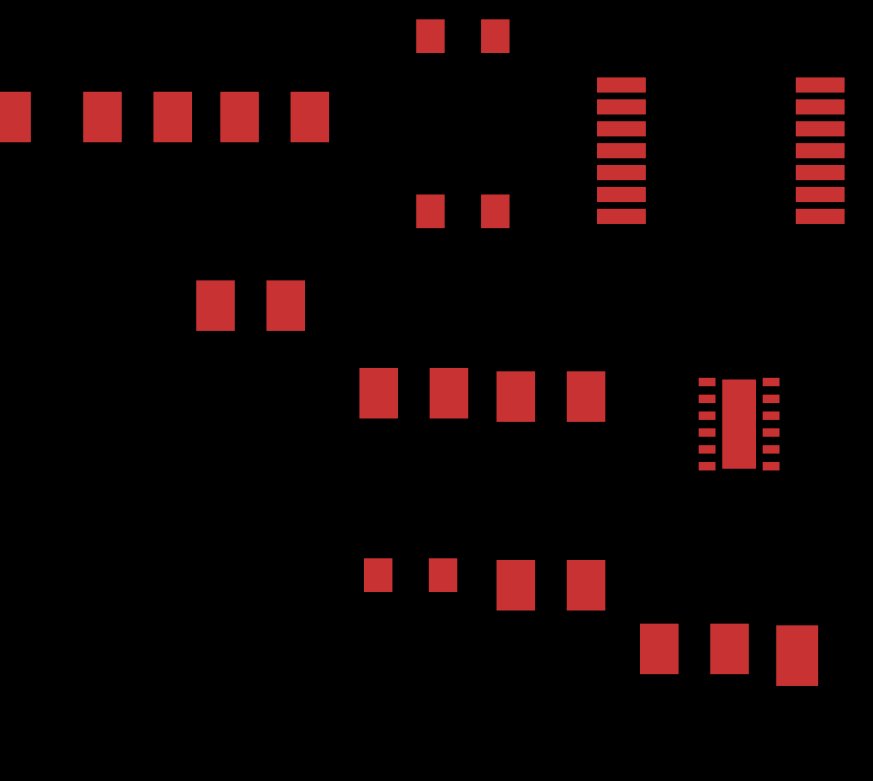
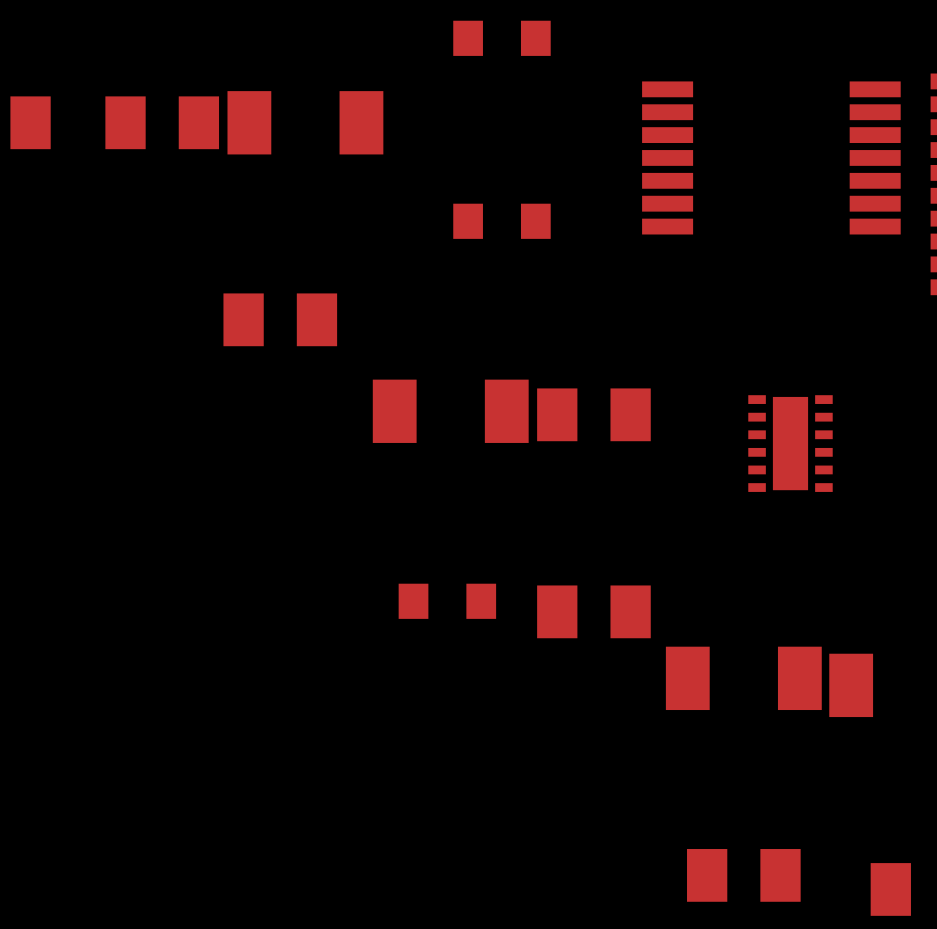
part footprint: [220, 91, 330, 143] -> [227, 91, 384, 155]
part footprint: [359, 367, 469, 419] -> [372, 379, 529, 443]
part footprint: [640, 623, 749, 675] -> [665, 646, 822, 711]

